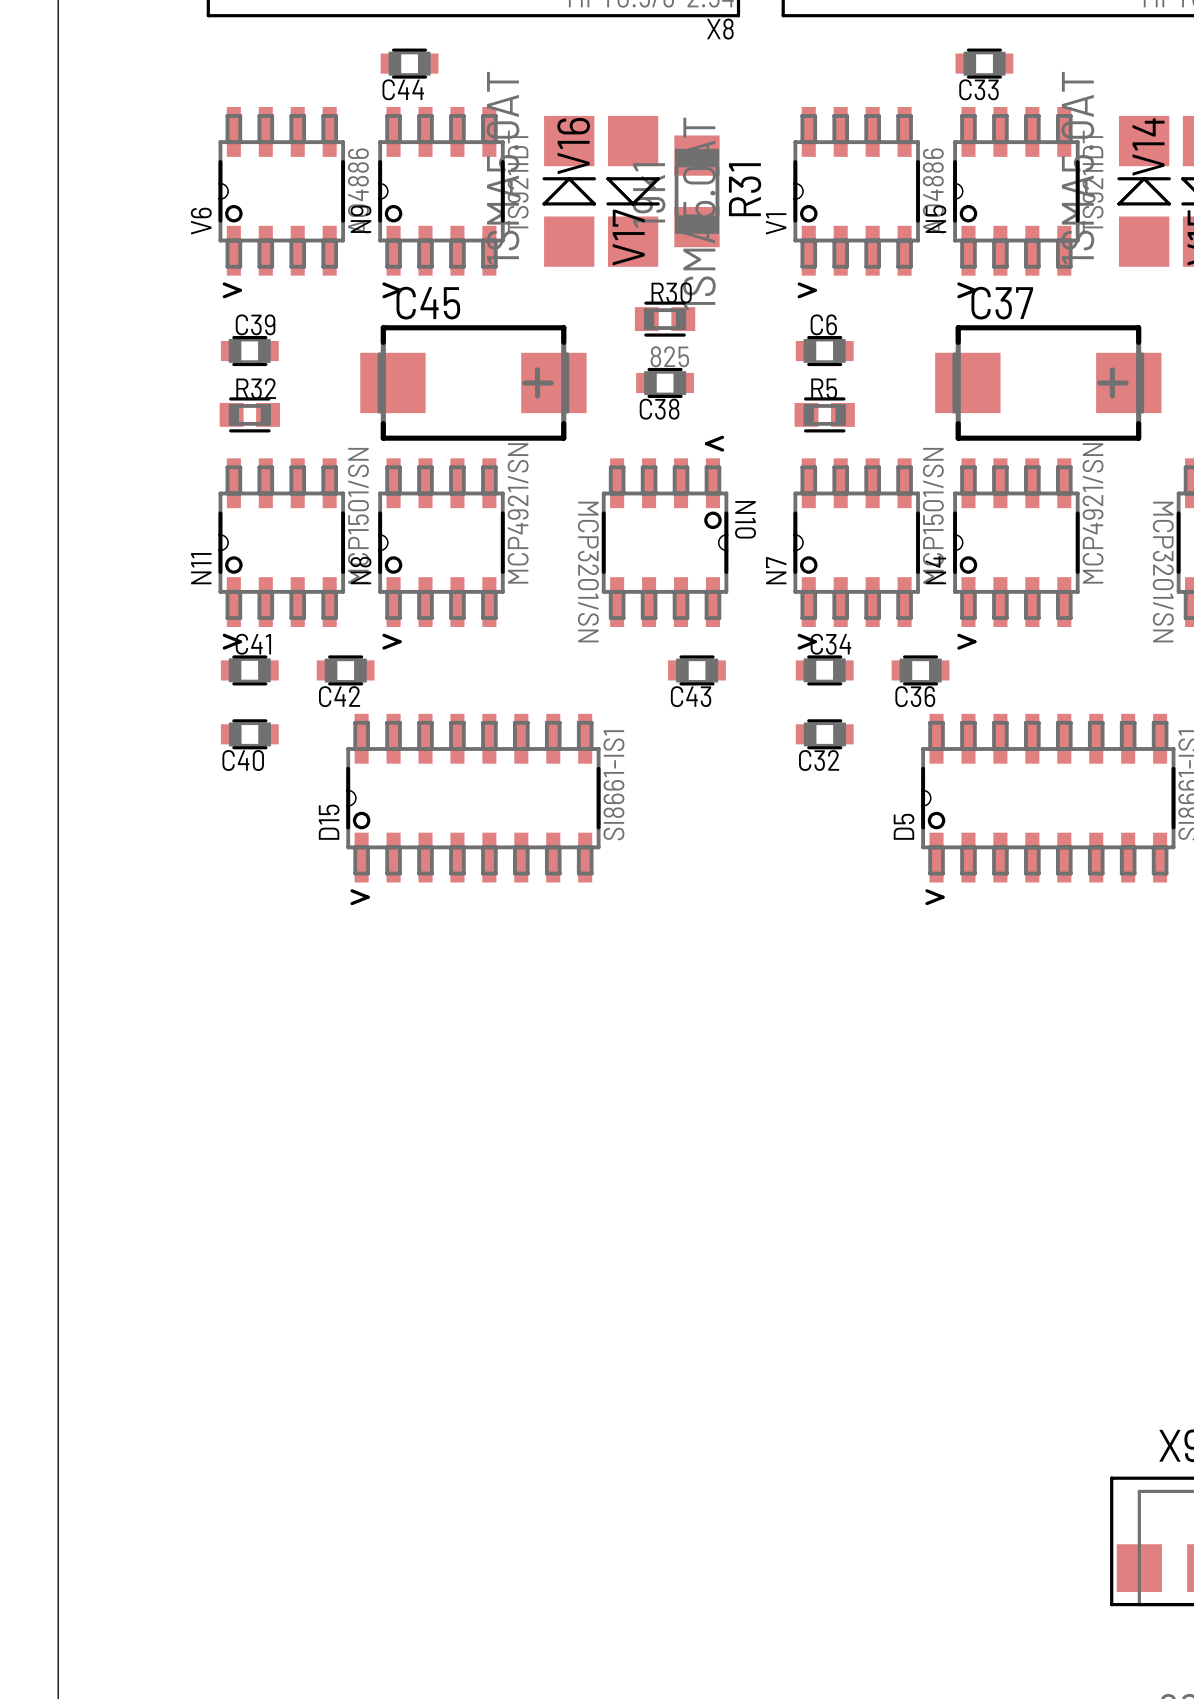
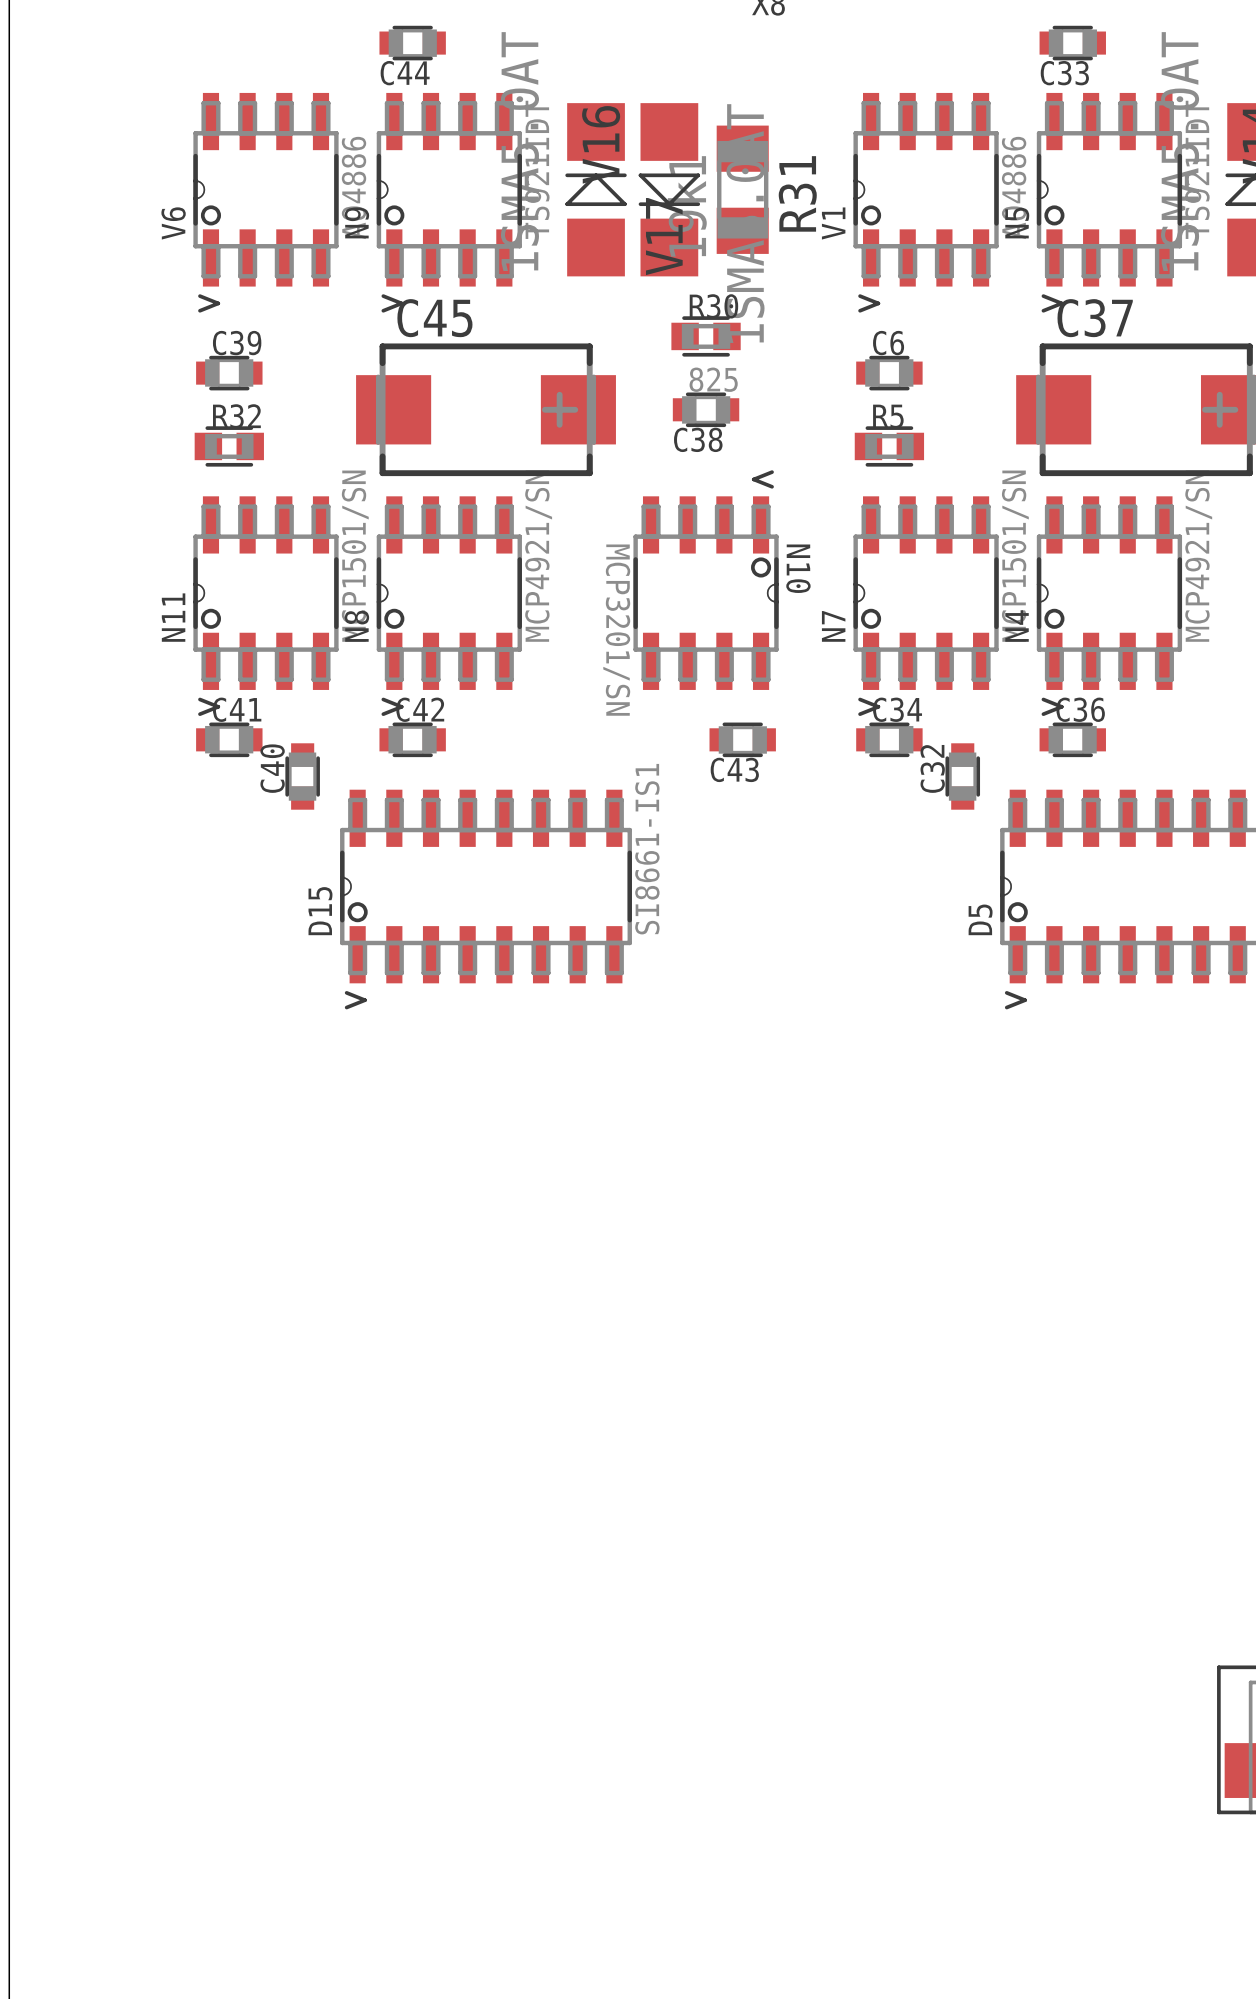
C42 position: (345, 670) -> (412, 739)
C36 position: (920, 670) -> (1072, 739)
C42 name position: C42 (339, 696) -> C42 (420, 709)
C36 name position: C36 (915, 696) -> C36 (1080, 709)
C40 rotation: 0° (249, 734) -> 90° clockwise (302, 776)
C40 position: (249, 734) -> (302, 776)
C32 rotation: 0° (824, 734) -> 90° clockwise (962, 776)
C32 position: (824, 734) -> (962, 776)

